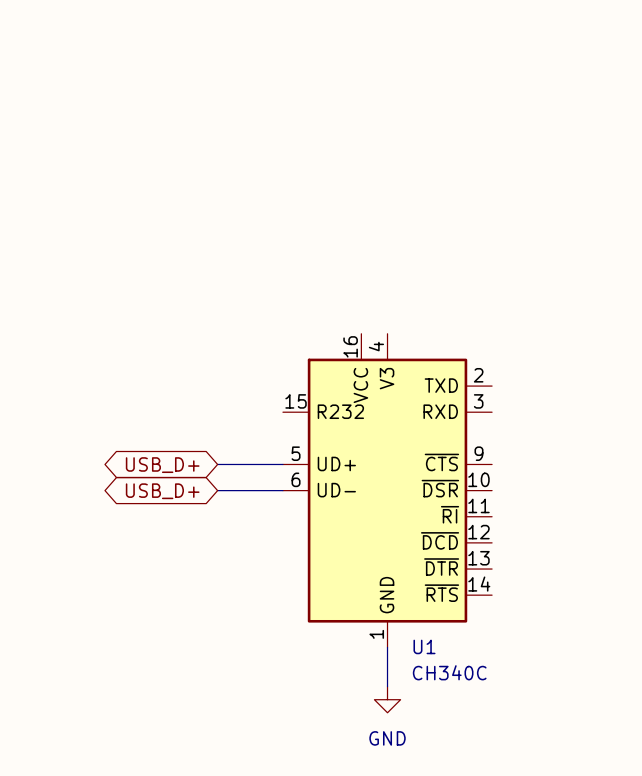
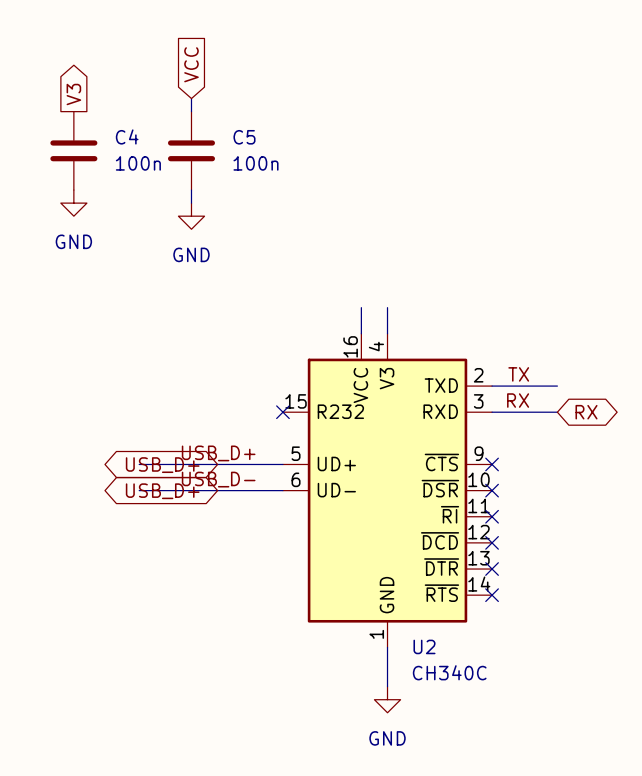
global label: none -> VCC (191, 64)
global label: none -> V3 (73, 94)
wire: none -> (191, 98) (191, 111)
C4: none -> 100n (73, 150)
C5: none -> 100n (191, 150)
wire: none -> (191, 190) (191, 203)
power symbol: none -> GND (73, 203)
power symbol: none -> GND (191, 216)
wire: none -> (361, 307) (361, 333)
wire: none -> (387, 307) (387, 333)
label: none -> TX (518, 374)
wire: none -> (492, 386) (557, 386)
label: none -> RX (518, 400)
no-connect mark: none -> (282, 412)
wire: none -> (492, 412) (557, 412)
global label: none -> RX (586, 412)
label: none -> USB_D+ (218, 453)
wire: none -> (139, 464) (217, 464)
no-connect mark: none -> (492, 464)
label: none -> USB_D- (218, 479)
wire: none -> (139, 490) (217, 490)
no-connect mark: none -> (492, 490)
no-connect mark: none -> (492, 516)
no-connect mark: none -> (492, 542)
no-connect mark: none -> (492, 569)
no-connect mark: none -> (492, 595)
U1 name: U1 (424, 646) -> U2 (424, 646)

